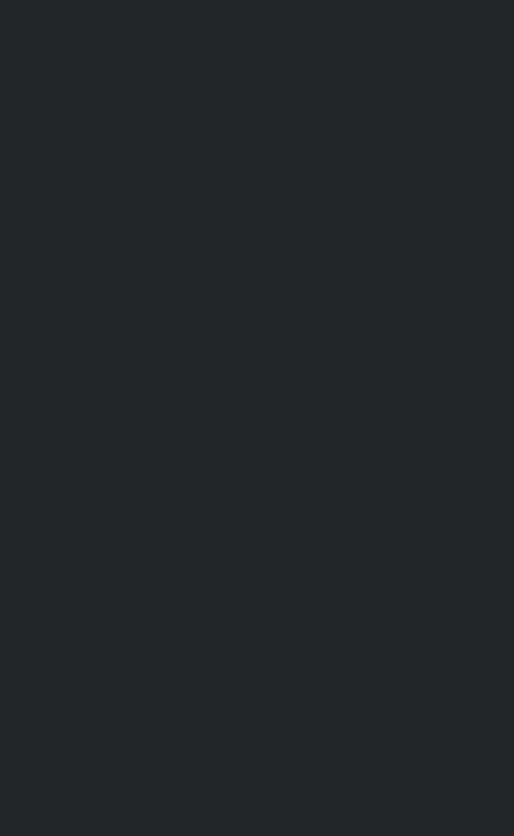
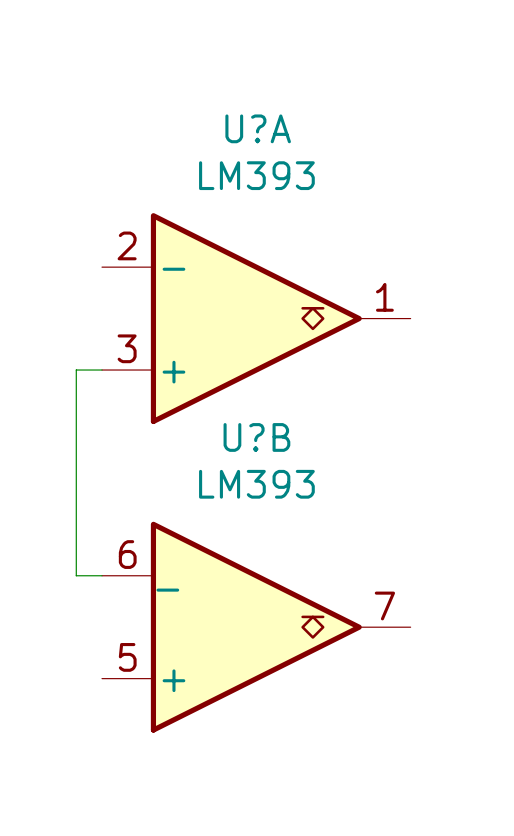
U?A: none -> LM393 (256, 318)
wire: none -> (102, 370) (76, 370) (76, 575) (102, 575)
U?B: none -> LM393 (256, 627)

